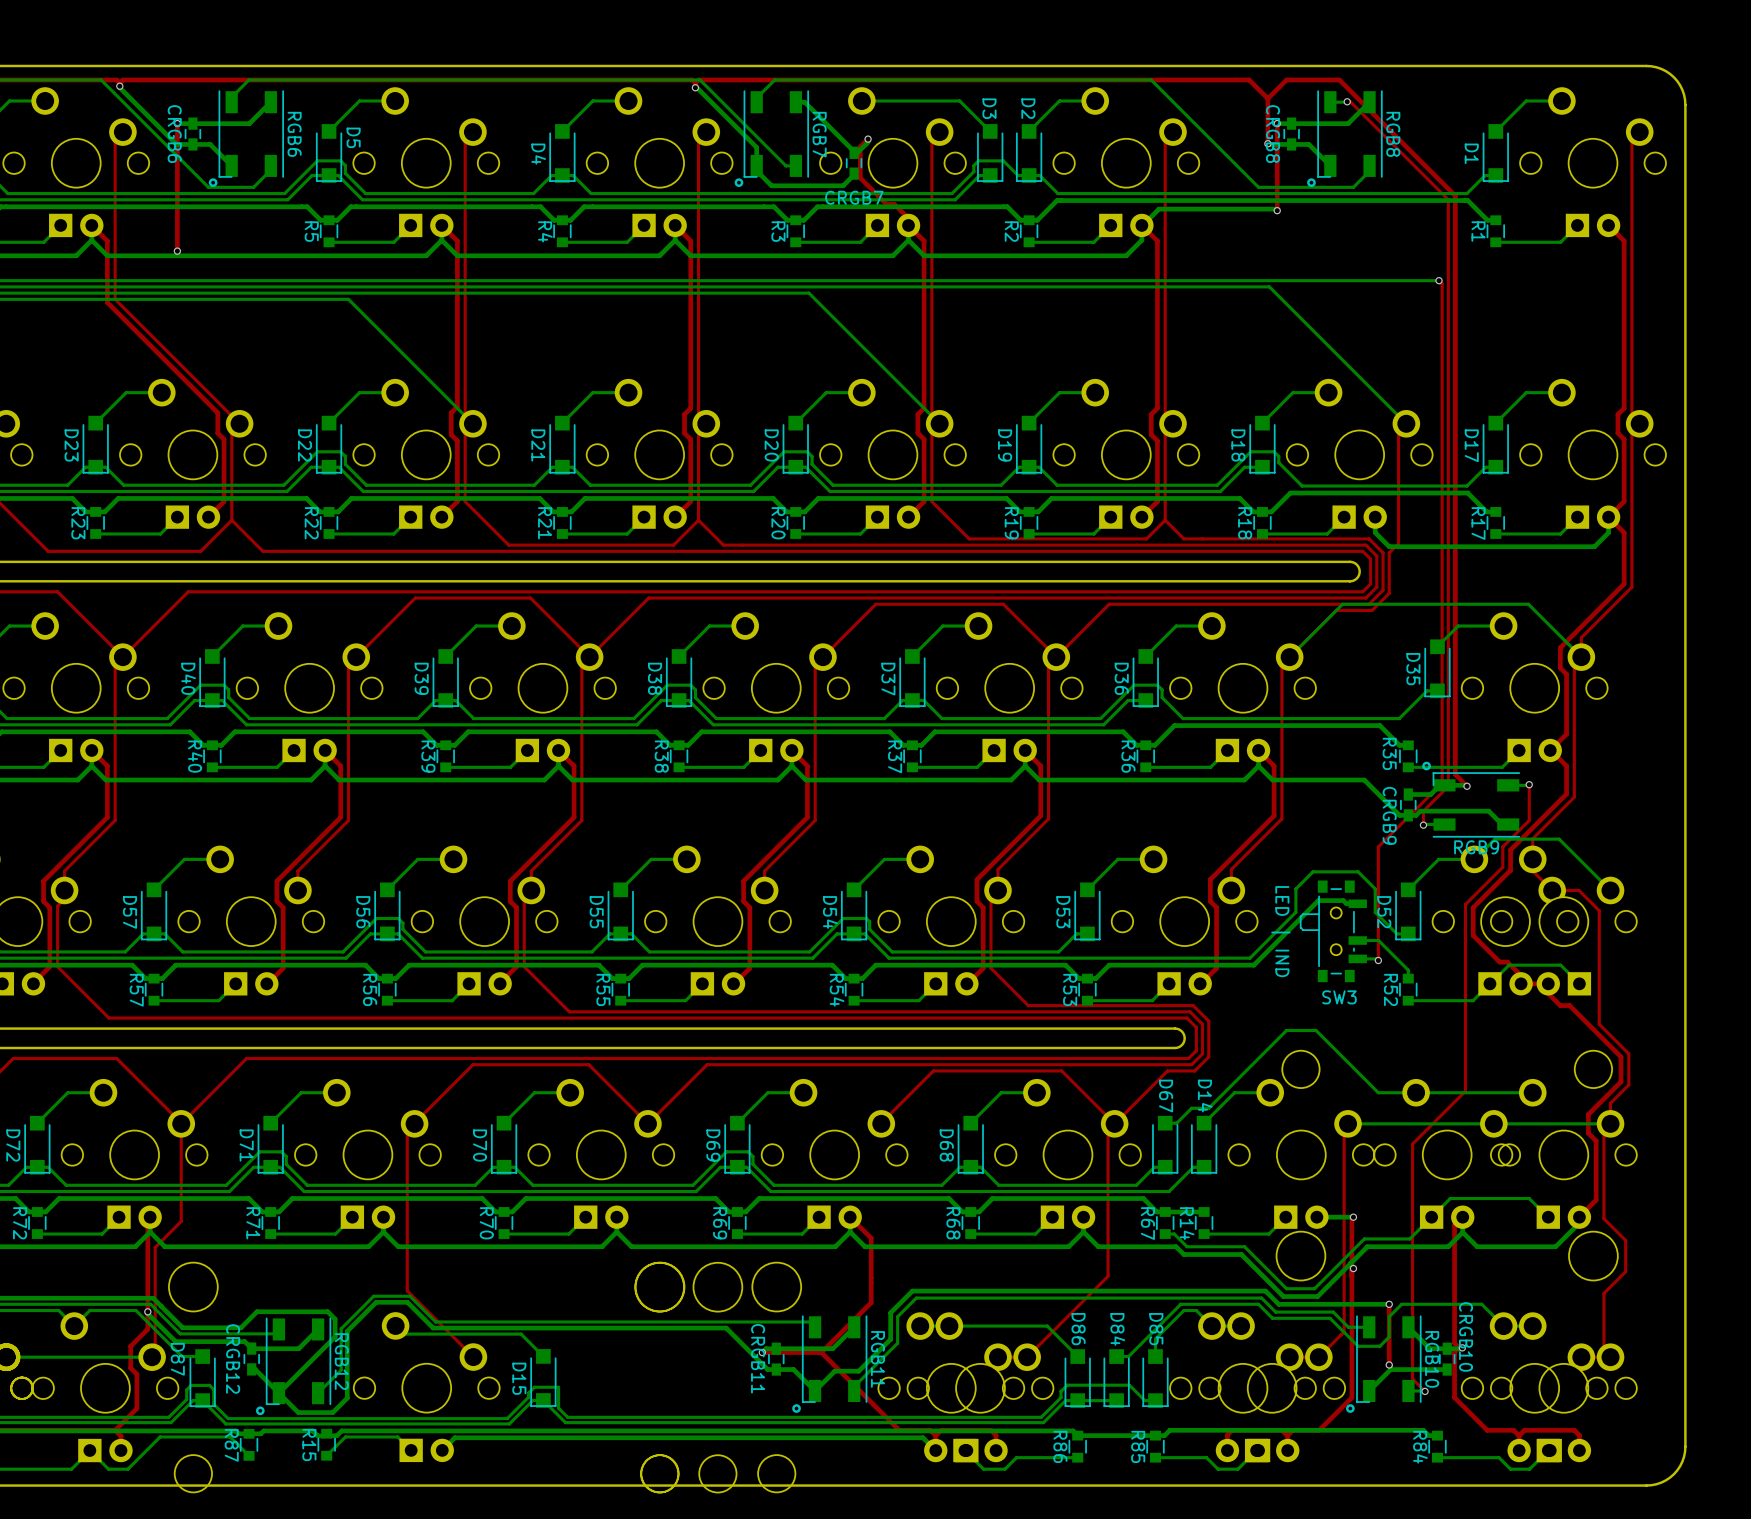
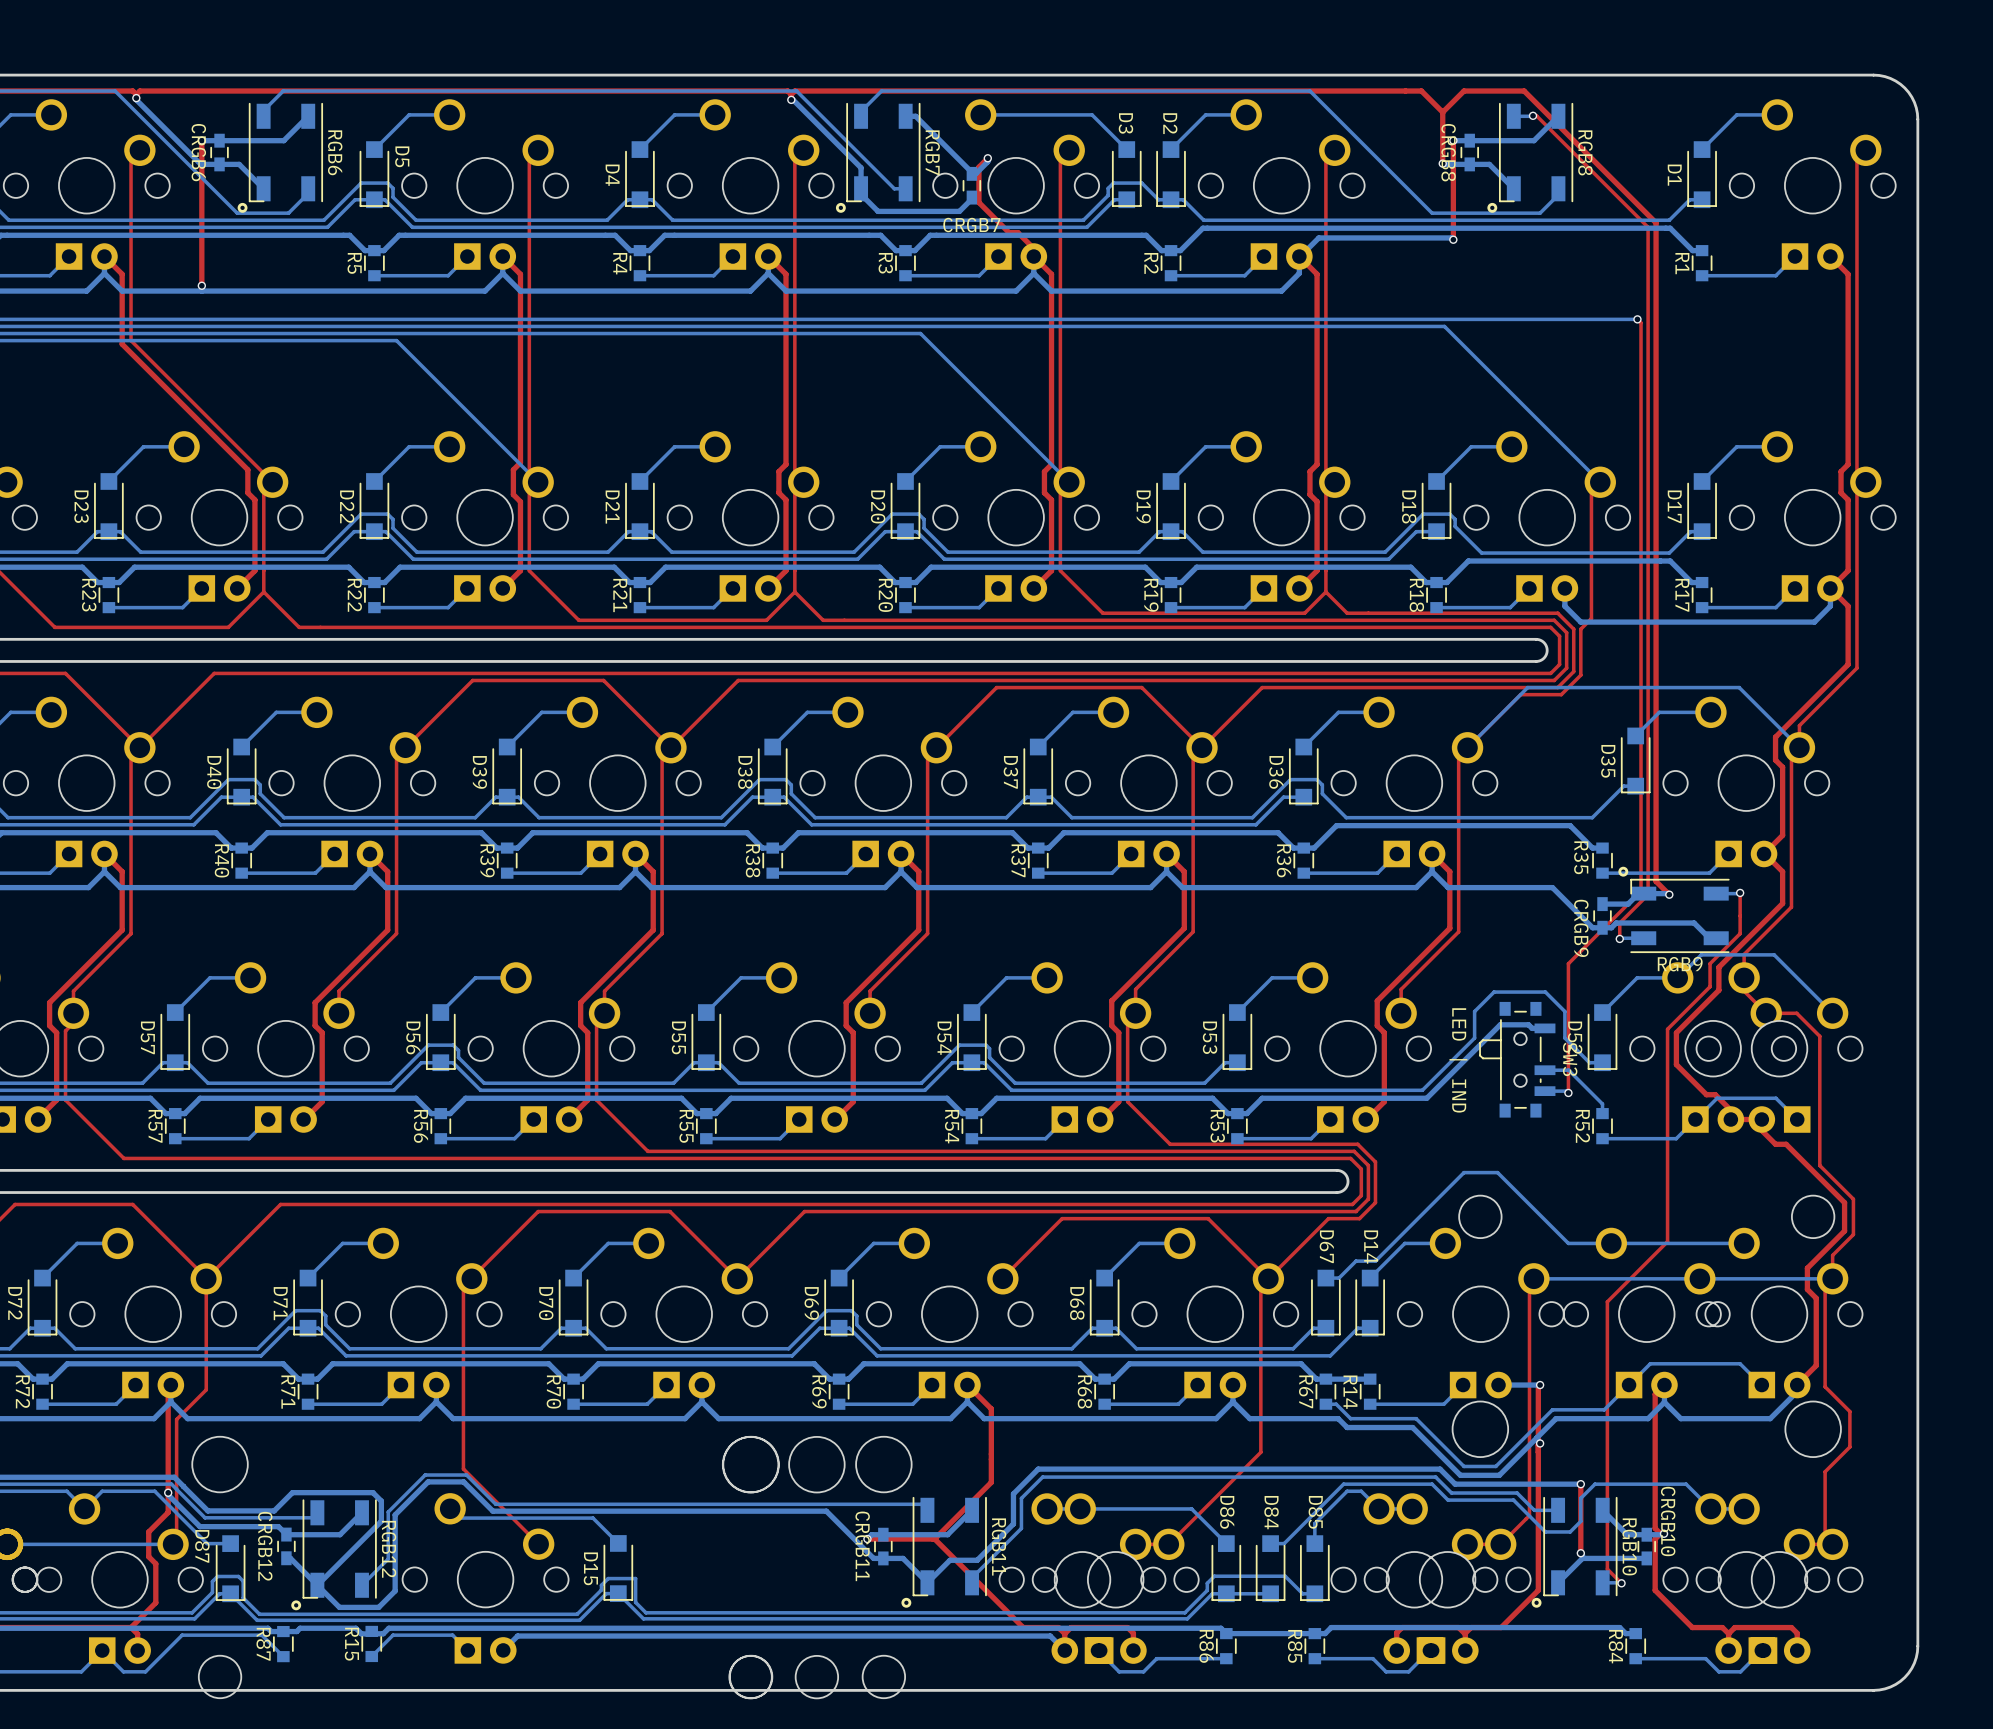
SW3 name rotation: 0° (1339, 997) -> 90° clockwise (1570, 1059)
SW3 name position: SW3 (1339, 997) -> SW3 (1570, 1059)

